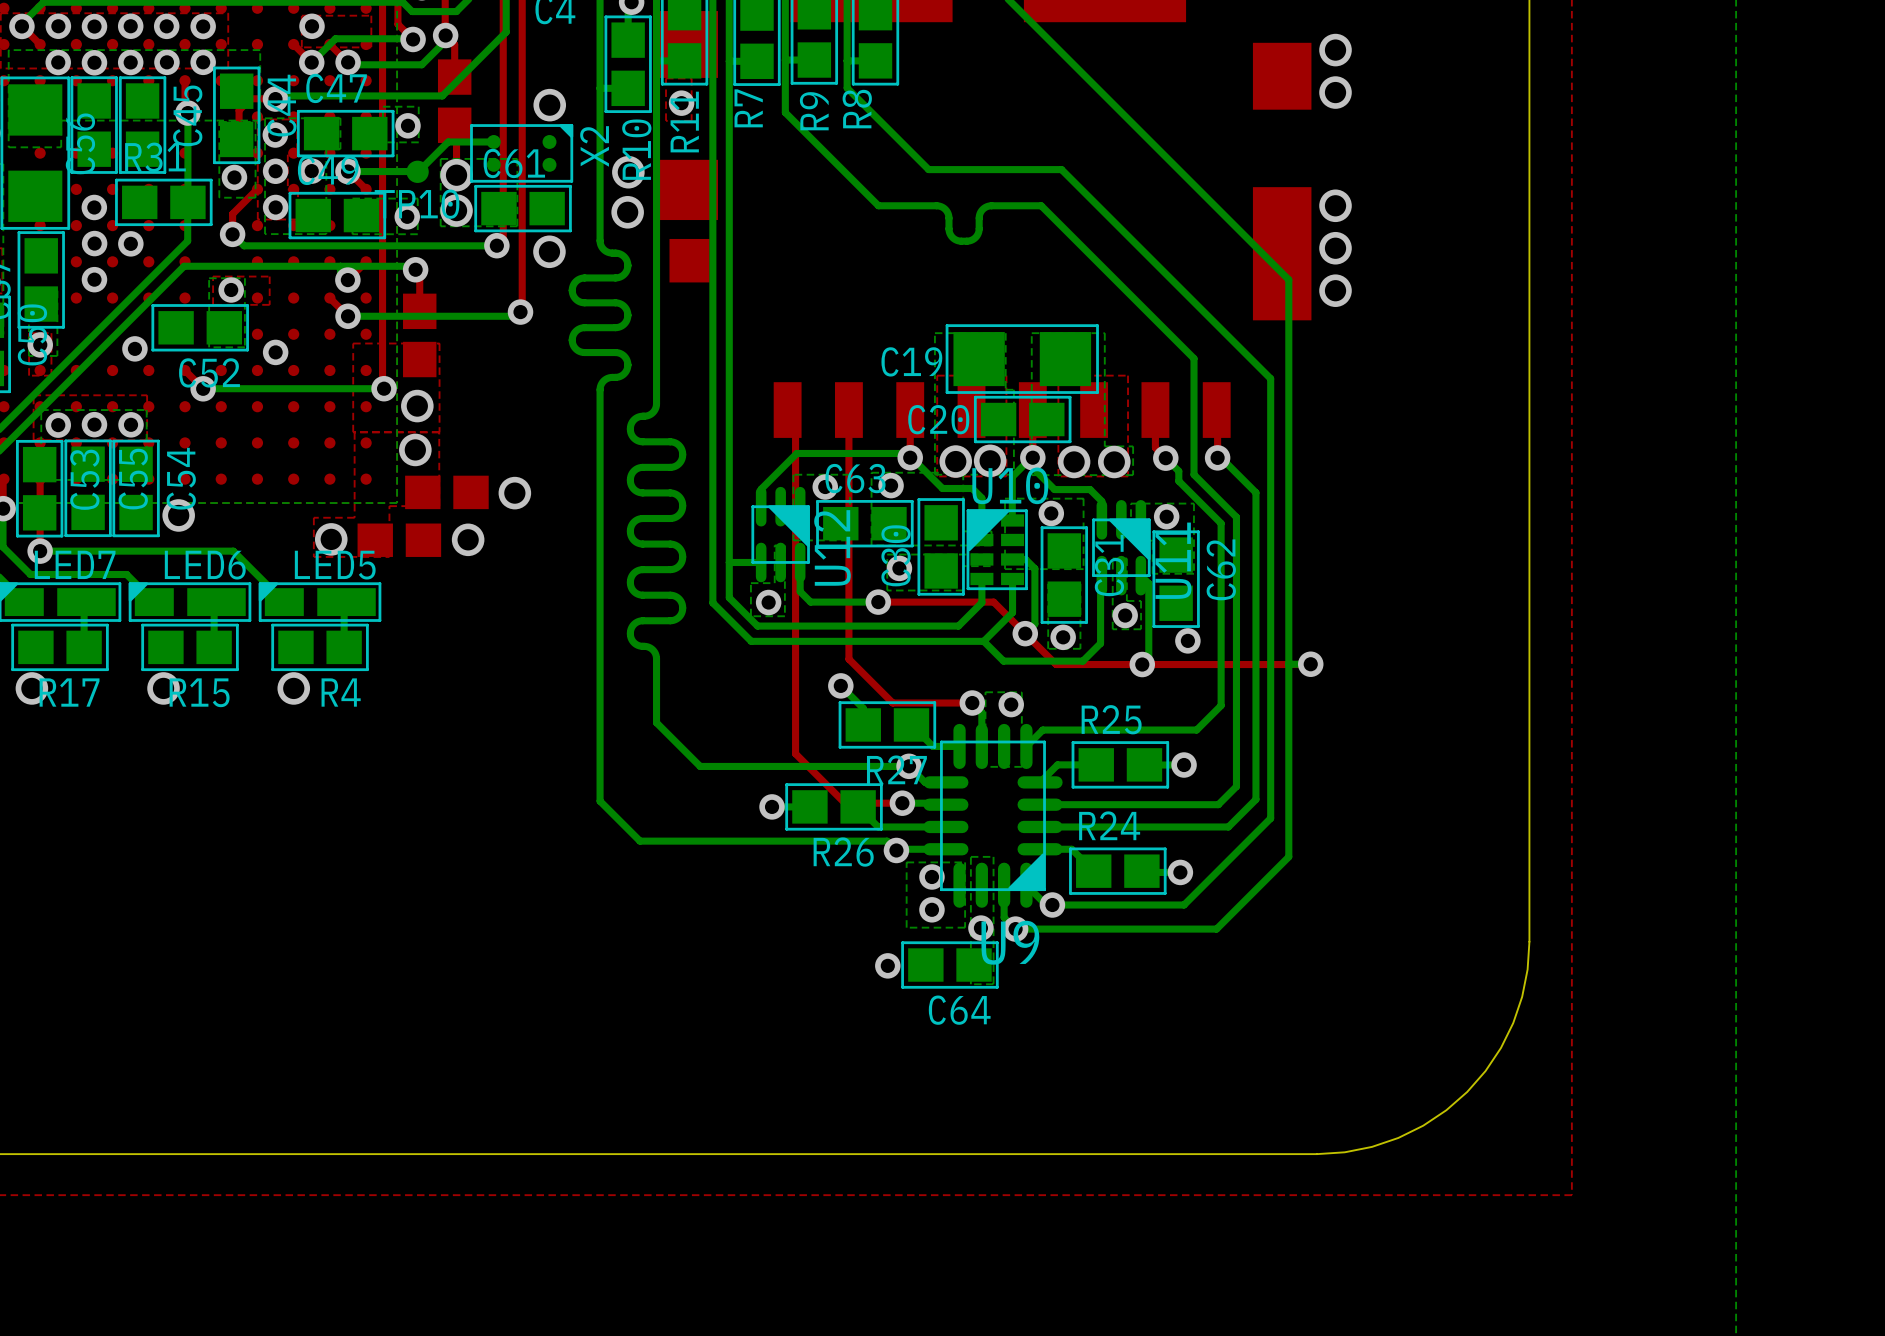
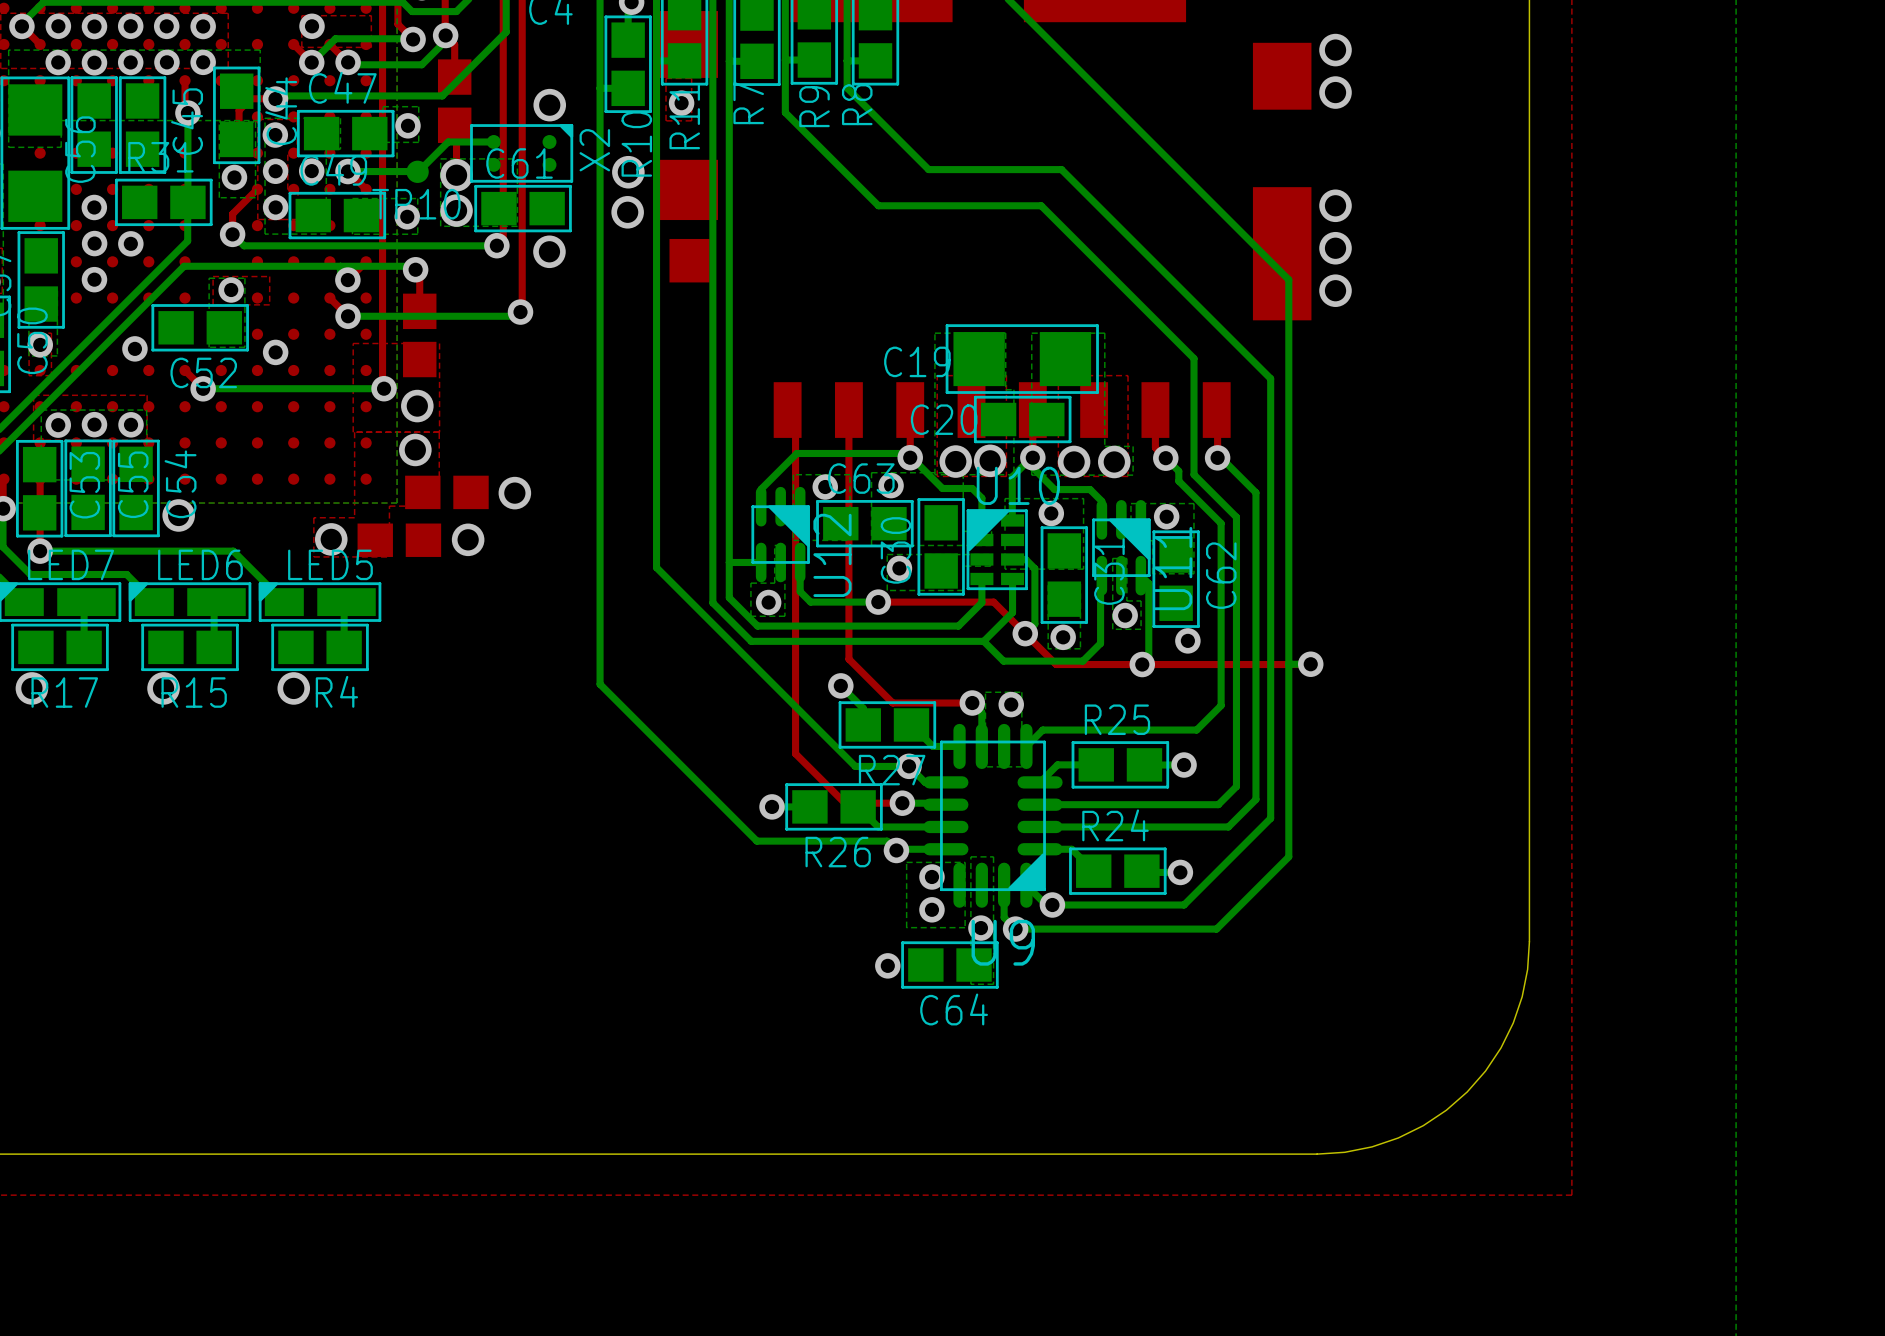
bottom track: (991, 205) (981, 210) (979, 216) (978, 233) (974, 238) (966, 241) (958, 240) (951, 236) (949, 230) (948, 213) (944, 208) (936, 205) -> (991, 205) (936, 205)
bottom track: (600, 240) (601, 246) (606, 251) (618, 253) (624, 256) (627, 265) -> none
bottom track: (627, 265) (626, 271) (620, 277) (581, 278) (575, 281) (572, 287) (573, 295) (579, 301) (618, 303) (624, 306) (627, 312) (626, 320) (620, 326) (583, 327) (577, 330) (573, 335) (573, 344) (579, 351) (617, 352) (626, 358) (627, 366) (625, 372) (620, 376) (604, 379) (600, 389) -> (600, 240) (600, 389)
bottom track: (656, 403) (652, 412) (635, 418) (630, 428) -> none
bottom track: (630, 429) (632, 436) (638, 440) (673, 442) (680, 446) (682, 454) -> none
bottom track: (682, 454) (681, 461) (675, 466) (639, 467) (632, 472) (630, 479) -> none
bottom track: (630, 480) (632, 488) (638, 491) (673, 493) (680, 497) (682, 505) -> none
bottom track: (682, 506) (680, 513) (673, 518) (638, 519) (632, 523) (630, 530) -> none
bottom track: (630, 531) (632, 539) (639, 543) (675, 545) (680, 548) (682, 556) -> none
bottom track: (682, 557) (680, 564) (673, 569) (638, 570) (632, 574) (630, 582) -> none
bottom track: (630, 582) (632, 590) (638, 594) (673, 595) (680, 600) (682, 607) -> none
bottom track: (682, 608) (680, 615) (675, 619) (639, 621) (632, 625) (630, 633) -> none
bottom track: (630, 633) (635, 643) (650, 647) (656, 655) (656, 722) (700, 766) (855, 766) -> (656, 403) (656, 567) (855, 766)
bottom track: (600, 684) (600, 801) (640, 841) (756, 841) -> (600, 684) (756, 841)

